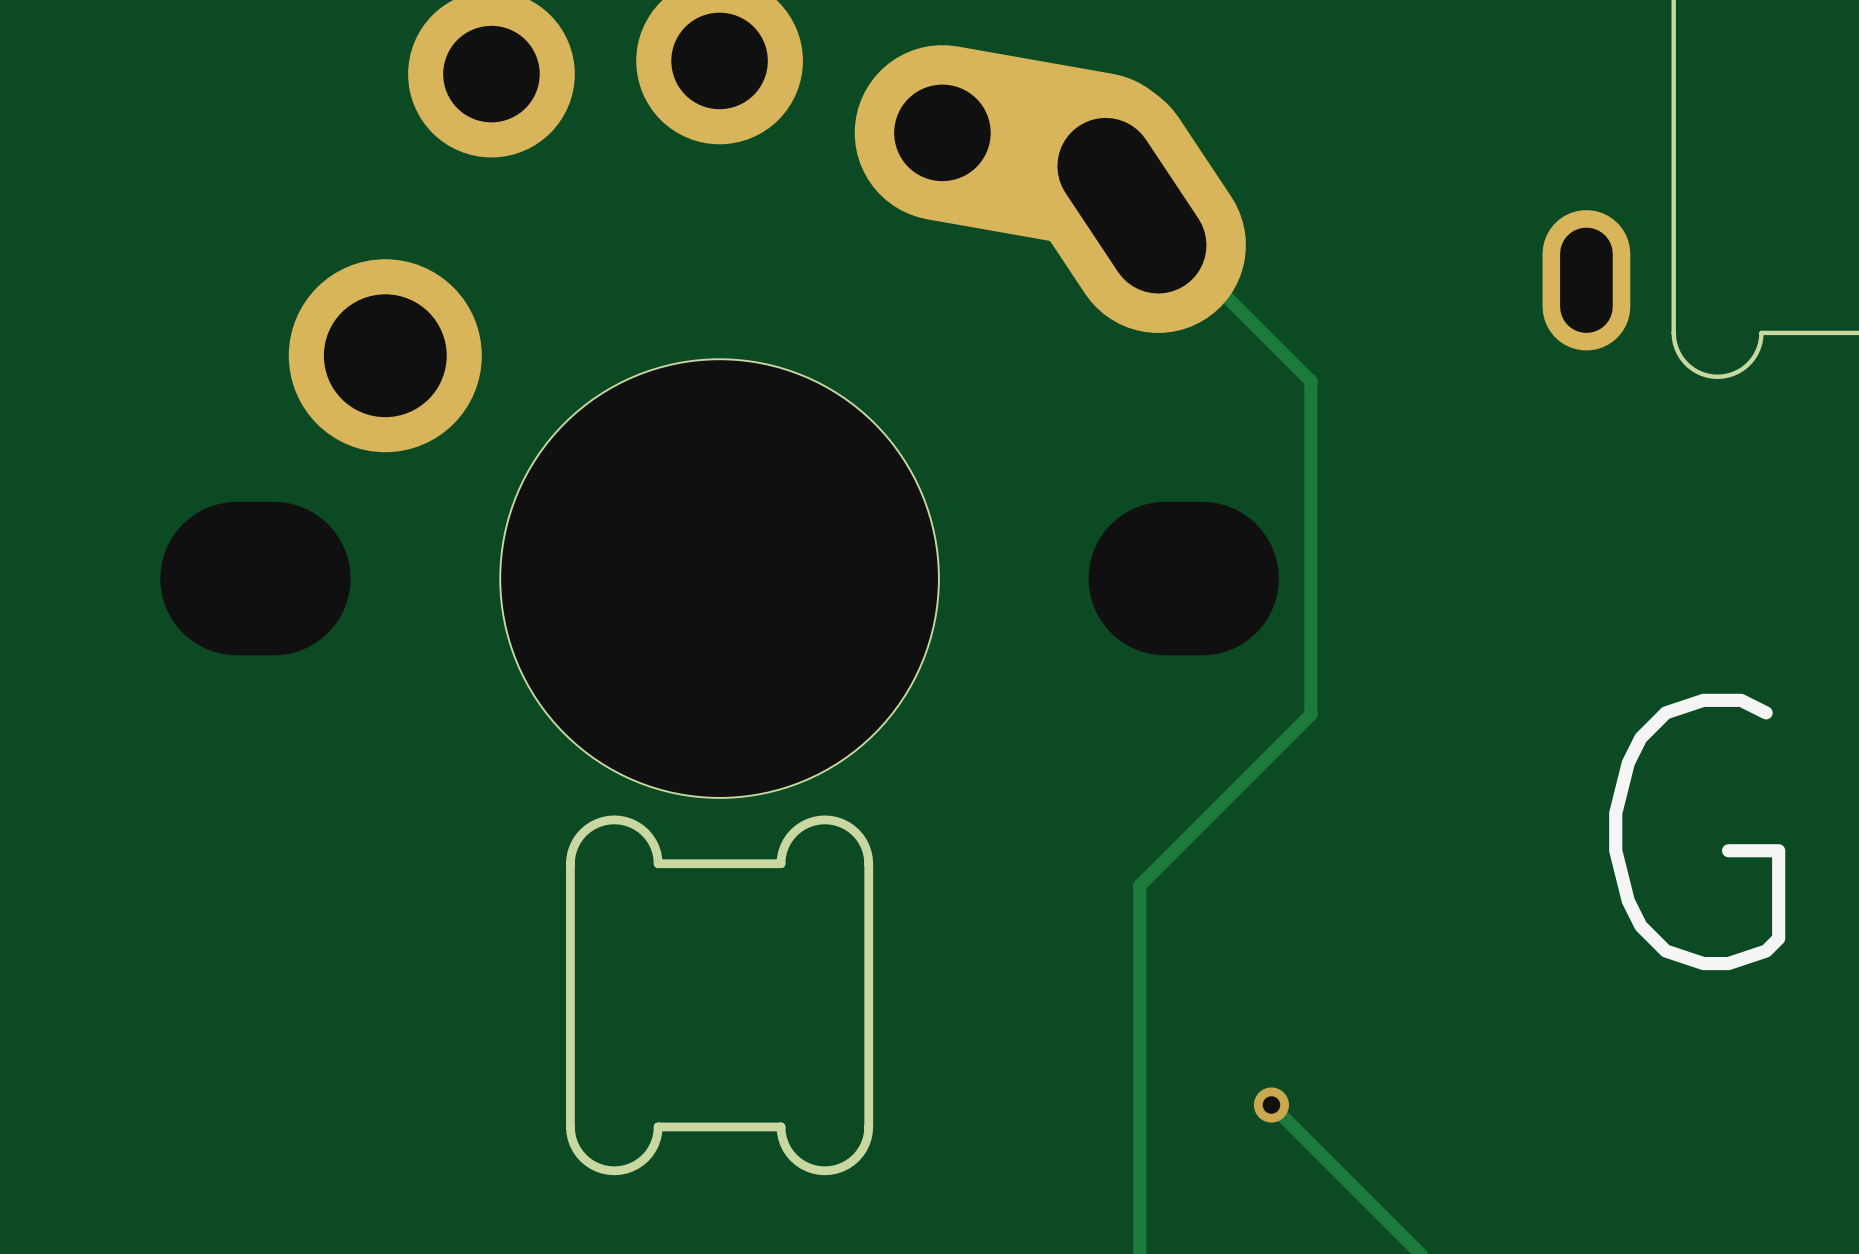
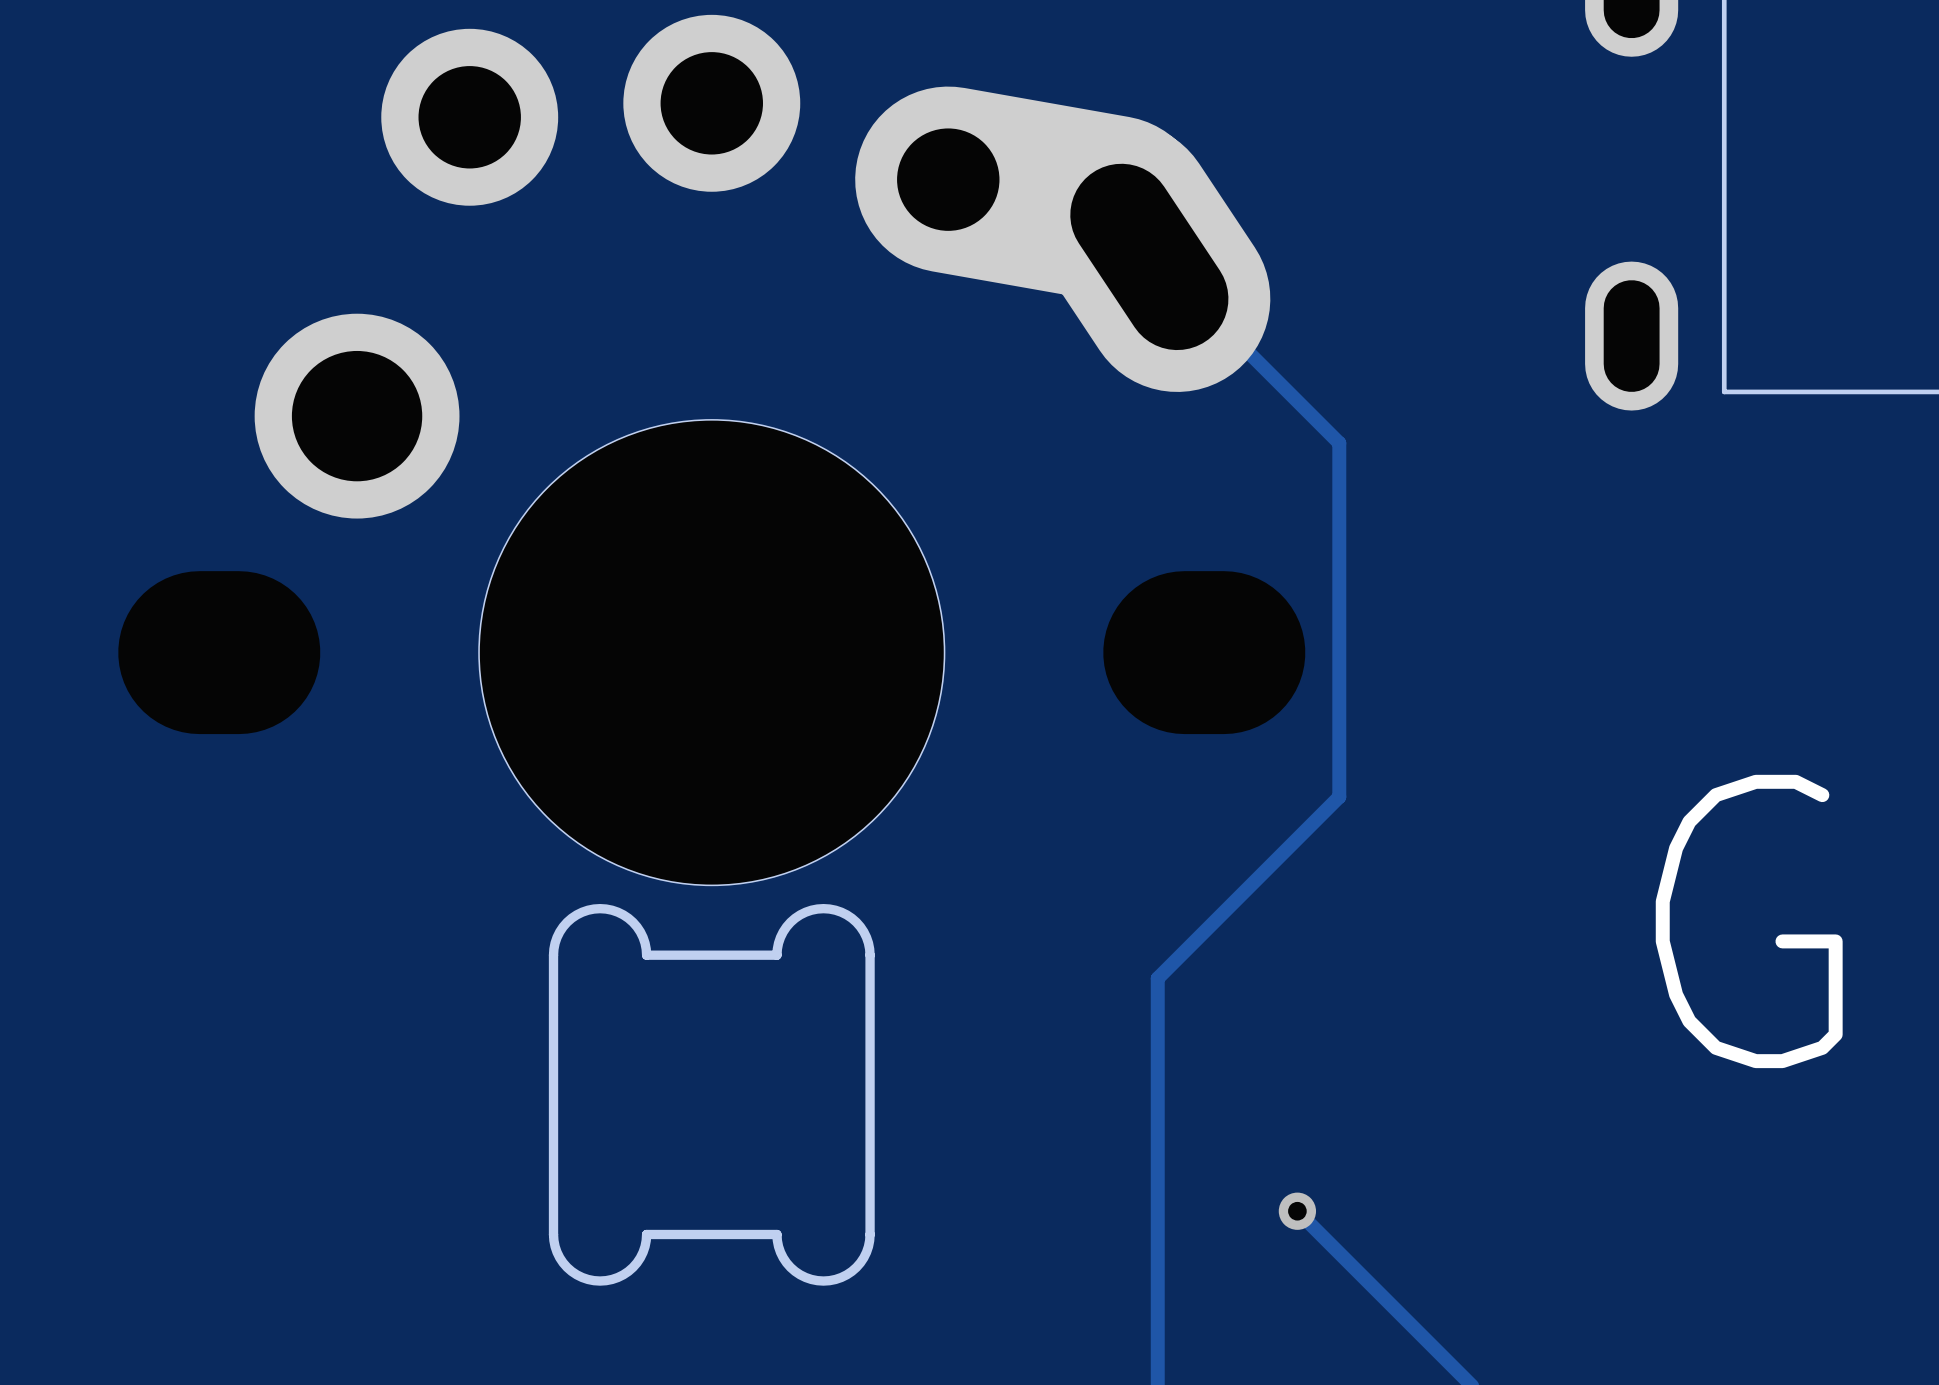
board edge: (1673, 332) (1676, 348) (1688, 365) (1702, 373) (1717, 376) (1733, 373) (1746, 365) (1758, 348) (1761, 332) -> (1724, 391) (1817, 391)

